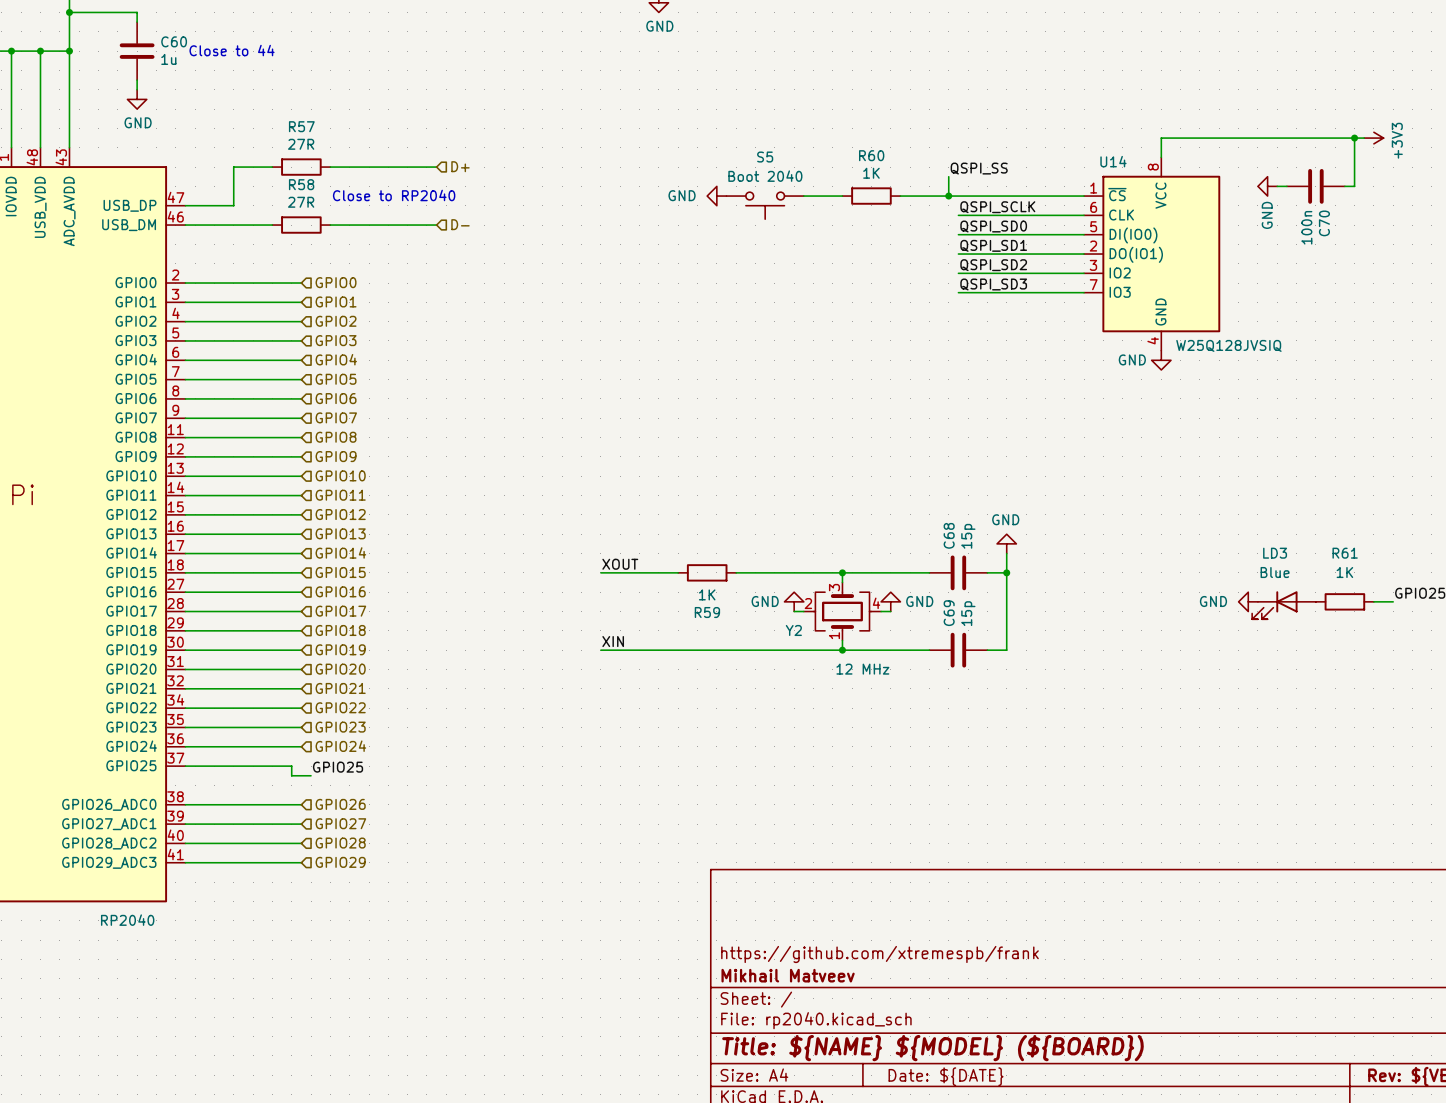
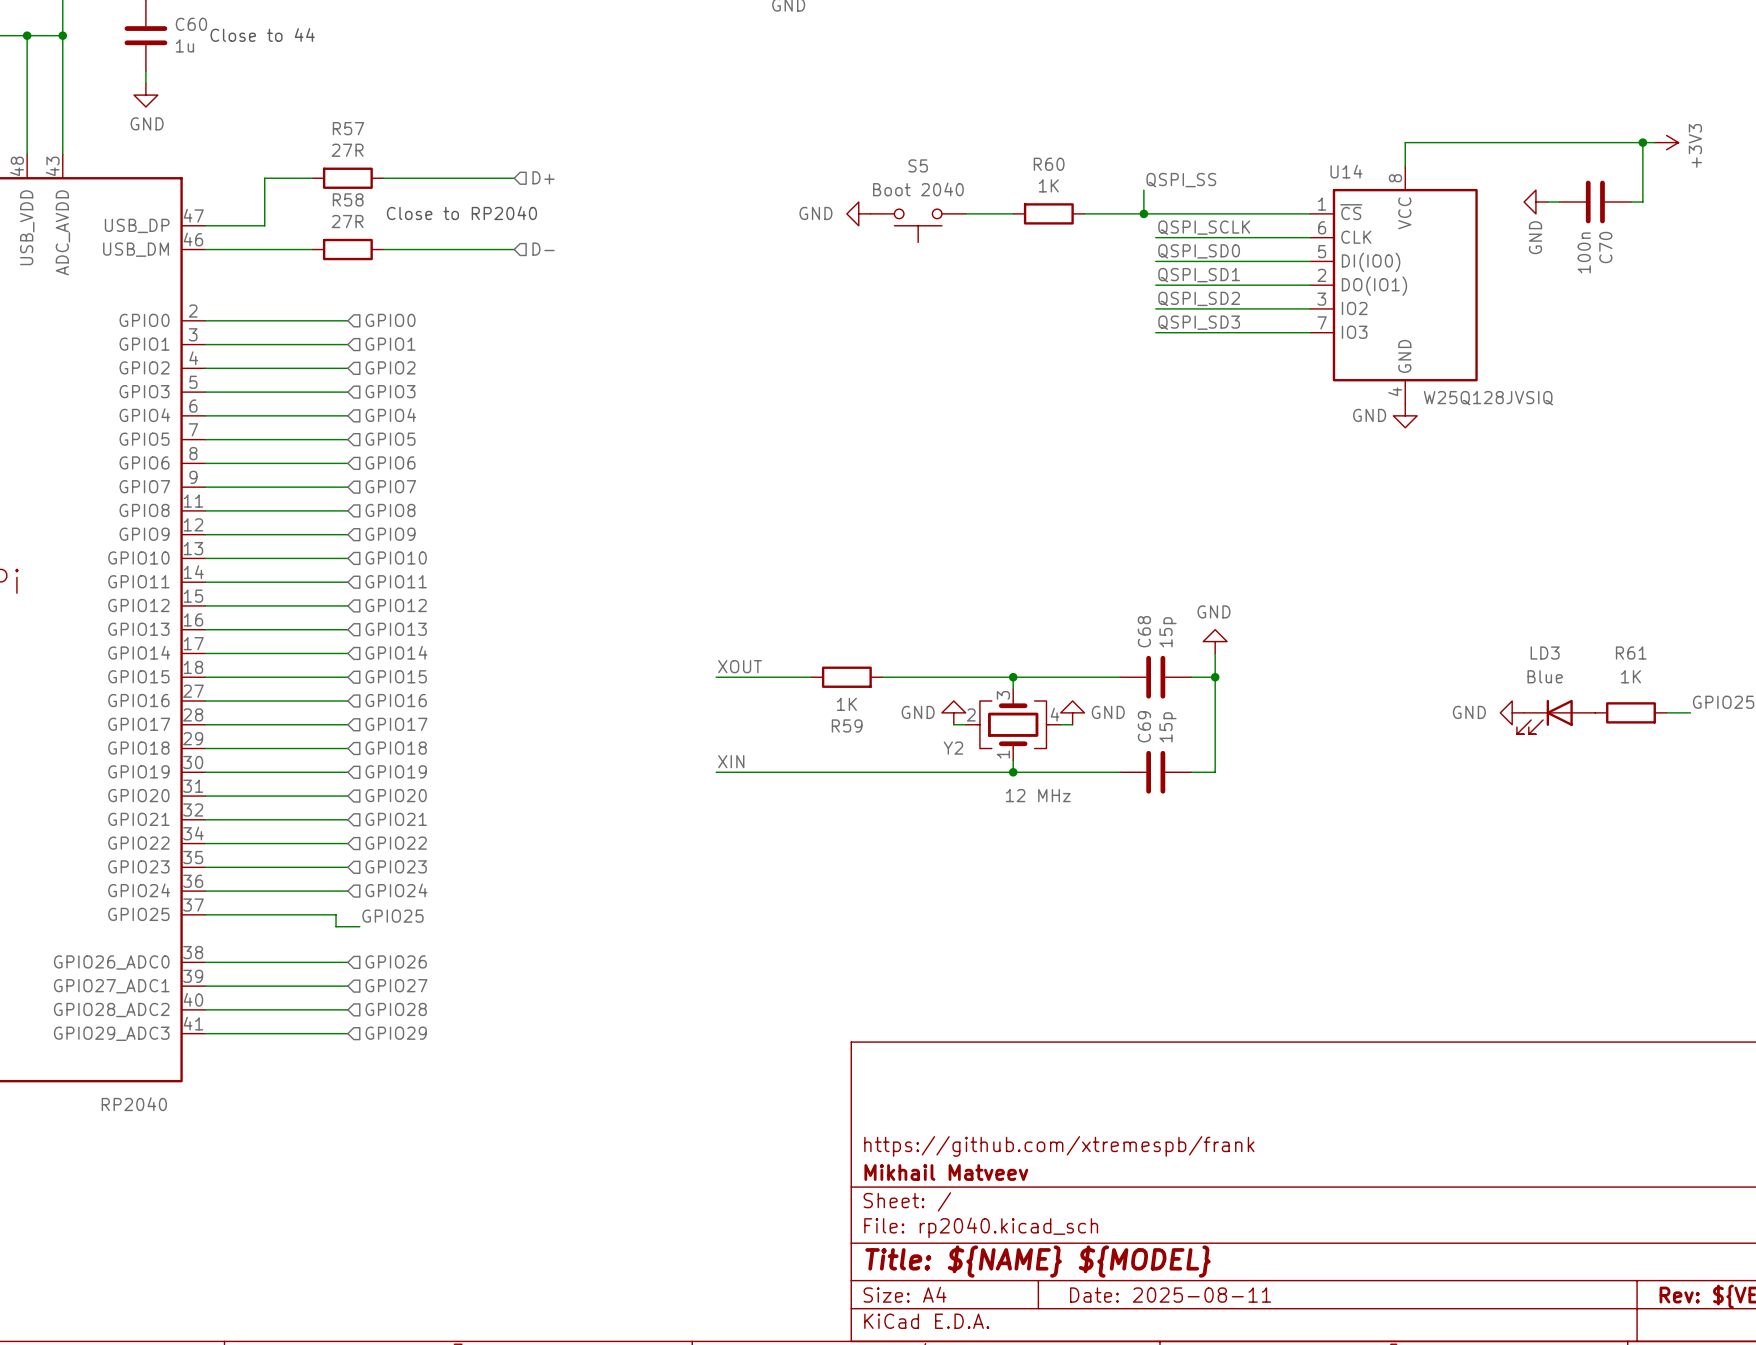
title block: Title: ${NAME} ${MODEL} (${BOARD}) (932, 1048) -> Title: ${NAME} ${MODEL} (1037, 1261)
title block: Date: ${DATE} (946, 1076) -> Date: 2025-08-11 (1170, 1295)

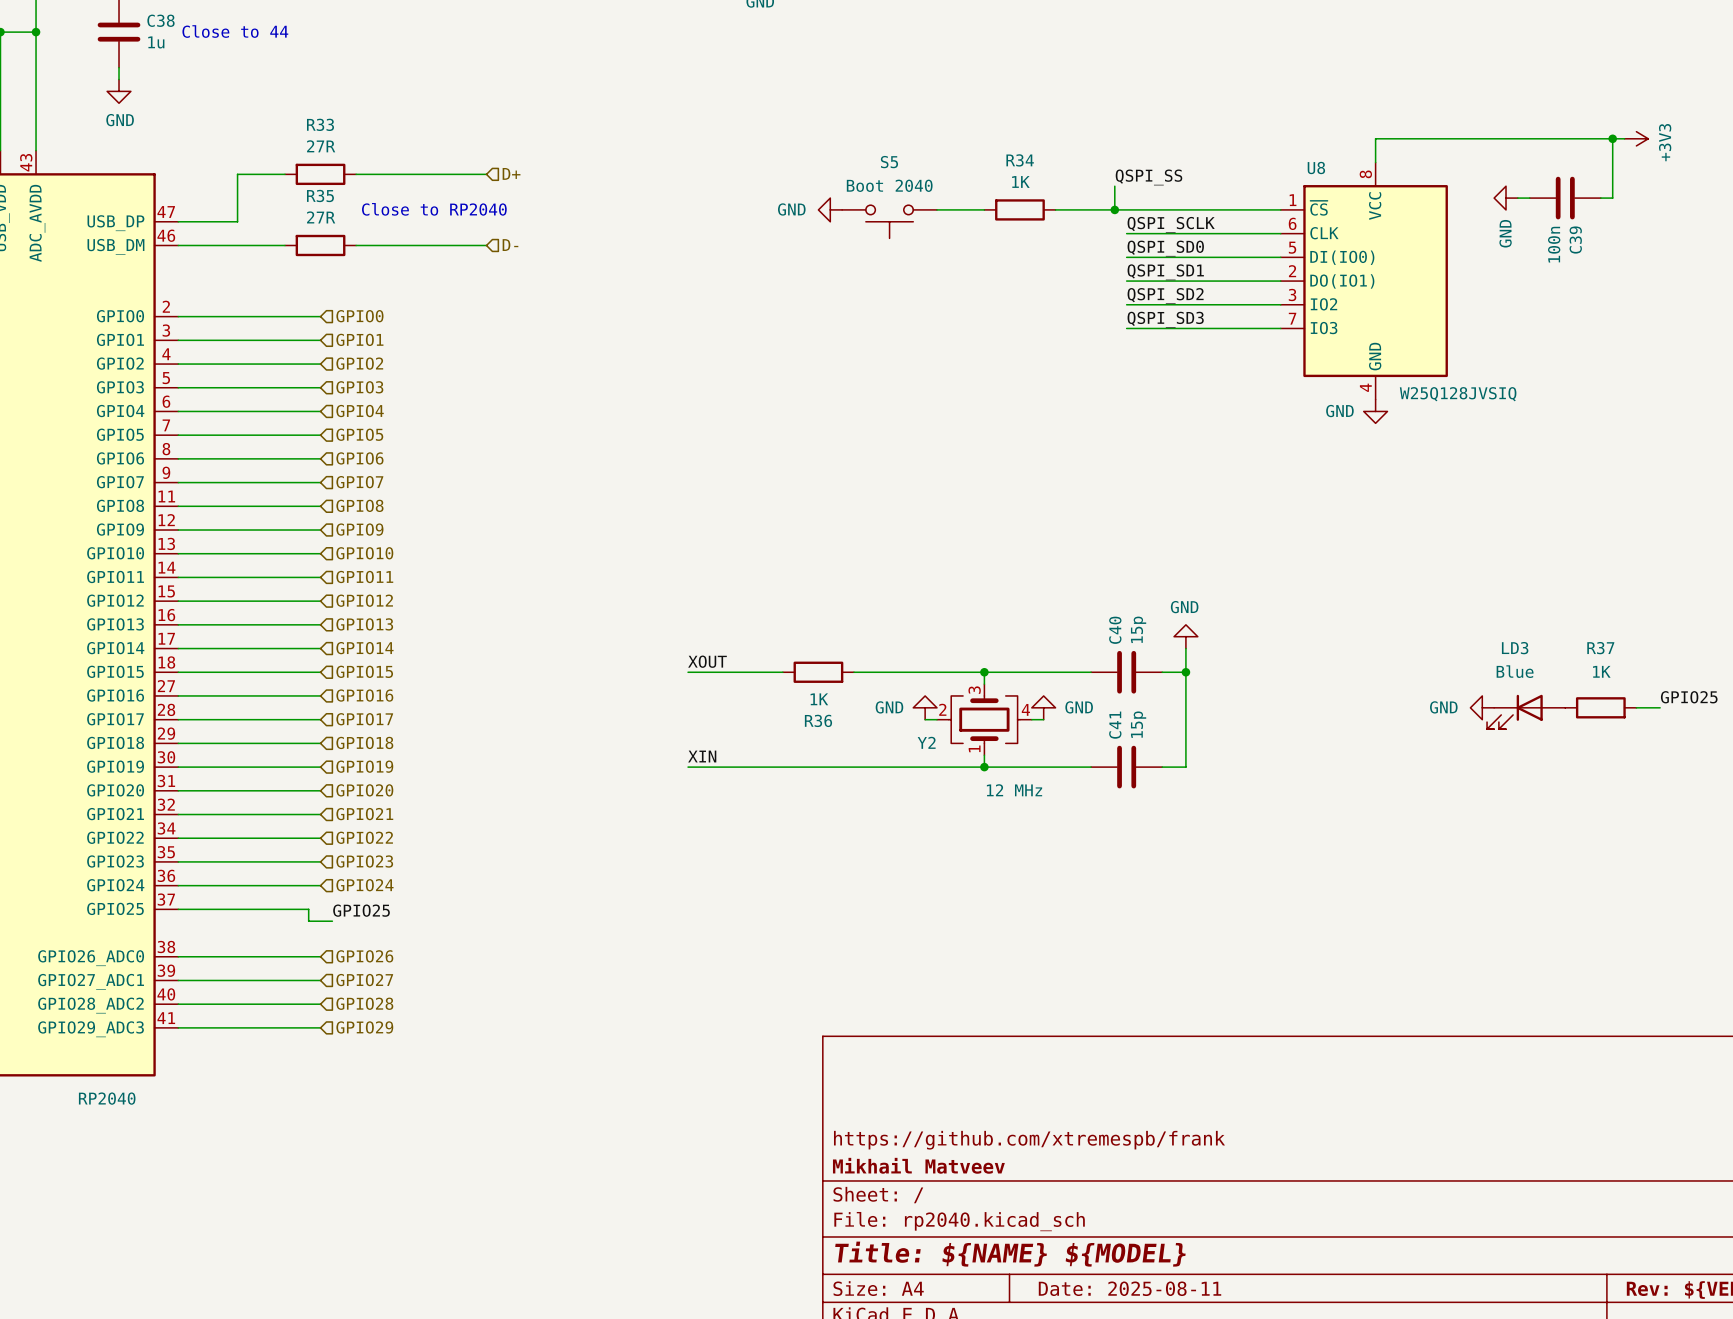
C60 name: C60 (191, 24) -> C38 (160, 20)
R57 name: R57 (348, 128) -> R33 (320, 124)
R60 name: R60 (1049, 164) -> R34 (1020, 160)
U14 name: U14 (1346, 171) -> U8 (1316, 168)
R58 name: R58 (348, 199) -> R35 (320, 195)
C70 name: C70 (1605, 247) -> C39 (1575, 240)
C68 name: C68 (1144, 631) -> C40 (1115, 630)
R61 name: R61 (1631, 653) -> R37 (1600, 648)
R59 name: R59 (847, 725) -> R36 (818, 720)
C69 name: C69 (1144, 726) -> C41 (1115, 725)

